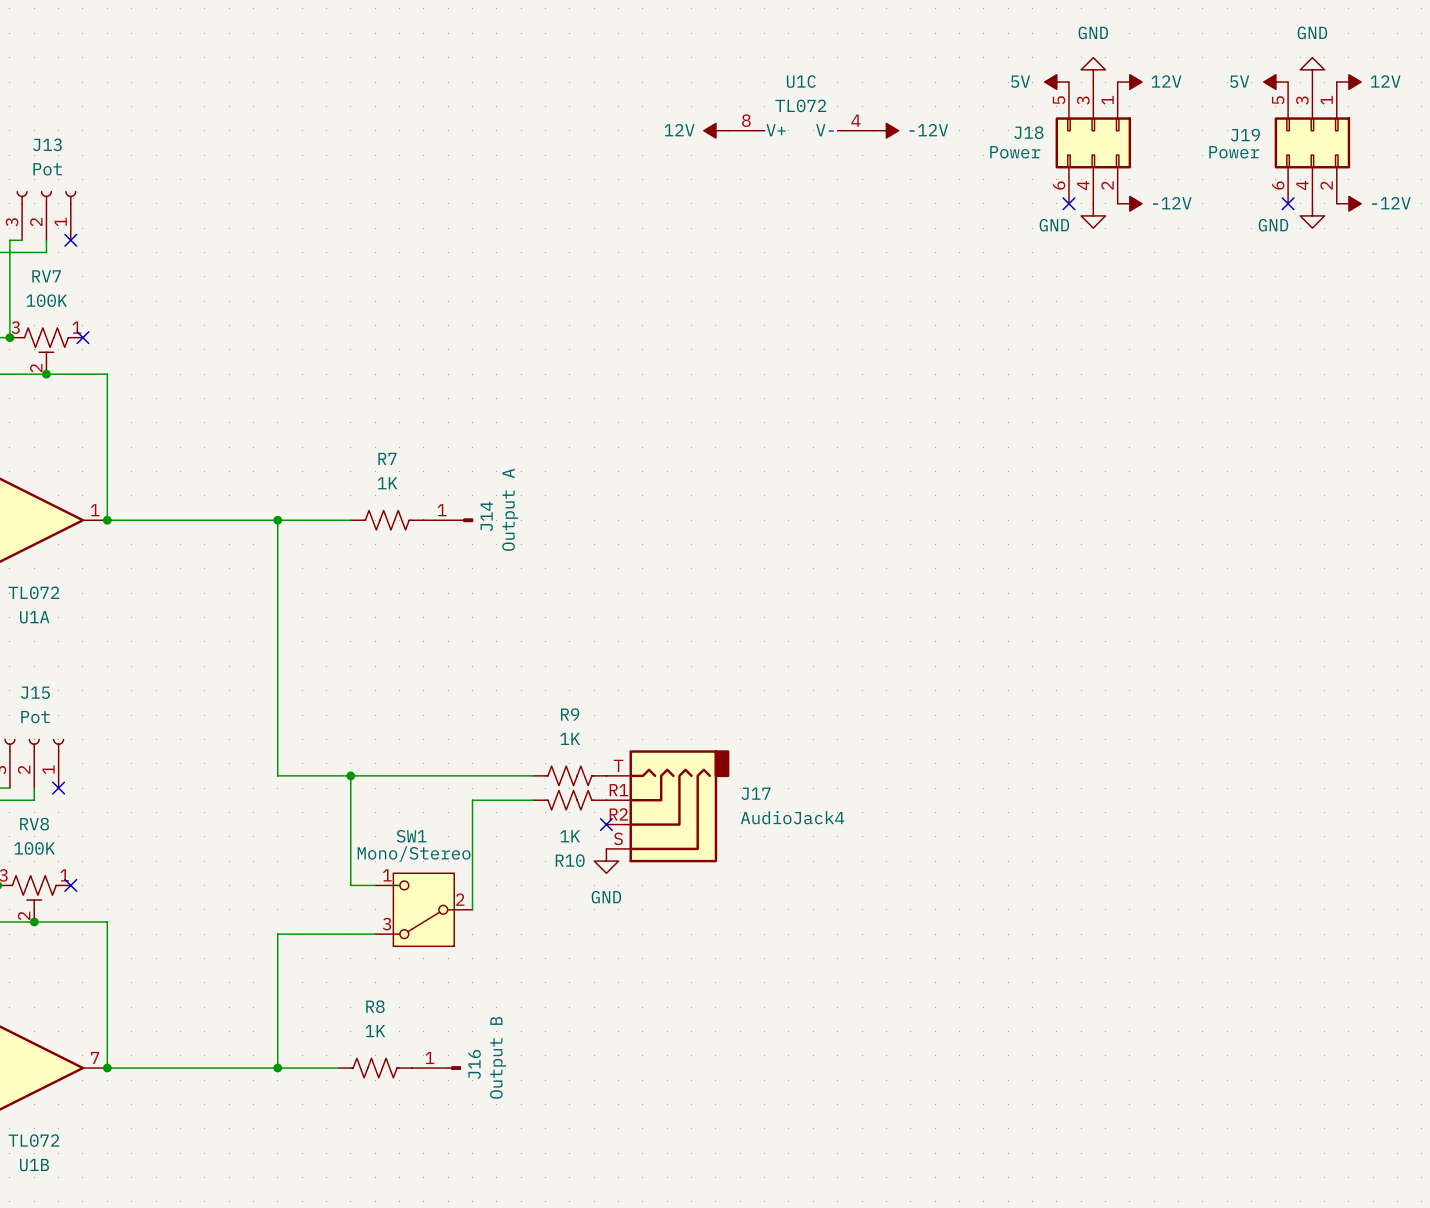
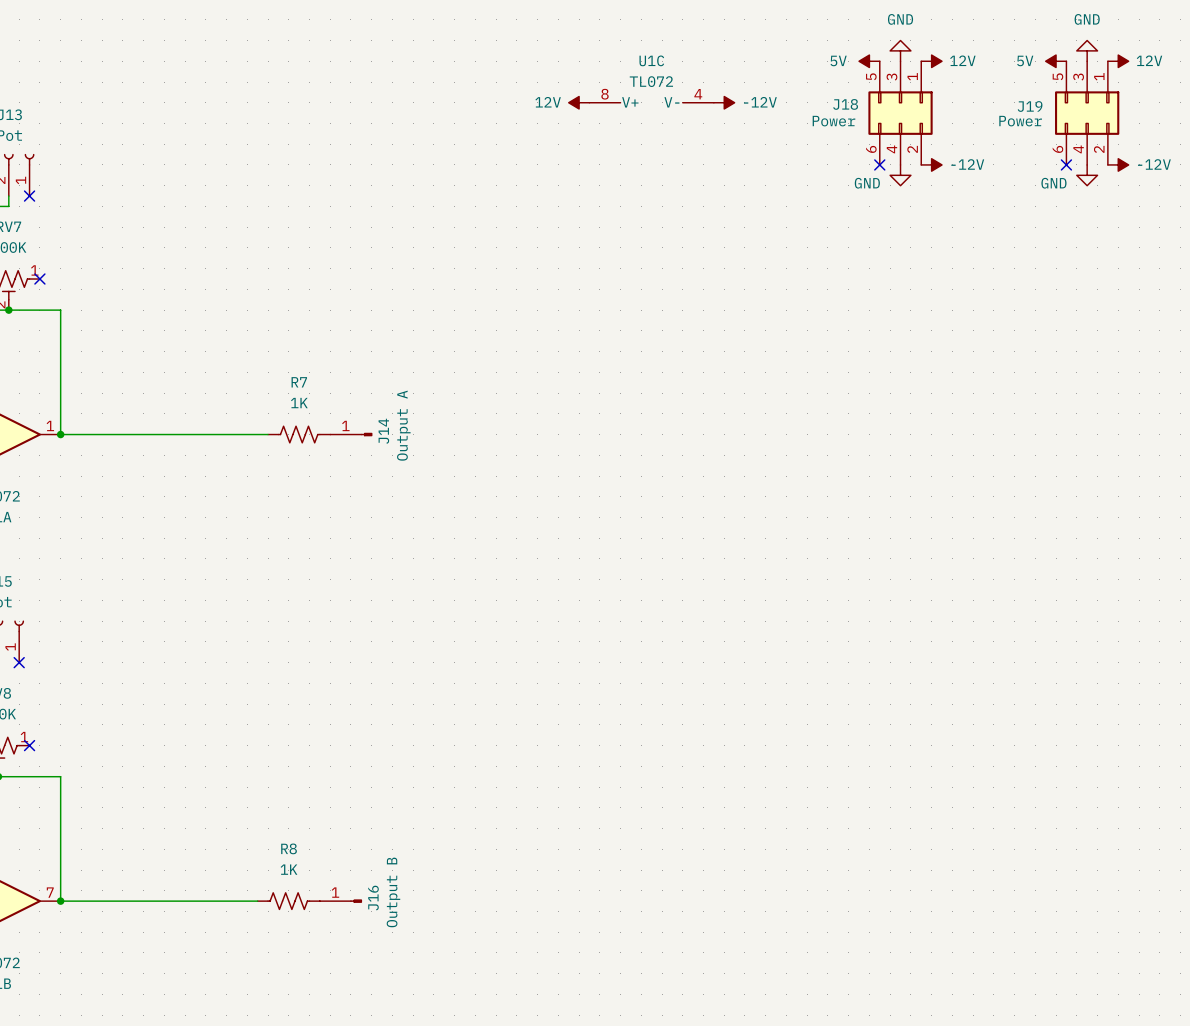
wire: (277, 520) (277, 775) (533, 775) -> none
junction: (277, 520) -> none
wire: (350, 775) (350, 885) (375, 885) -> none
junction: (350, 775) -> none
R9: 1K (569, 775) -> none
wire: (533, 800) (472, 800) (472, 909) -> none
R10: 1K (569, 800) -> none
J17: AudioJack4 (667, 806) -> none
no-connect mark: (606, 824) -> none
power symbol: GND (606, 861) -> none
SW1: Mono/Stereo (423, 909) -> none
wire: (375, 934) (277, 934) (277, 1068) -> none
junction: (277, 1068) -> none

